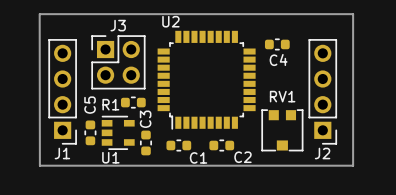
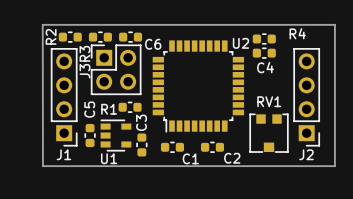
U2 name position: U2 (170, 21) -> U2 (240, 43)
J3 name rotation: 0° (118, 25) -> 90° counterclockwise (85, 71)
J3 name position: J3 (118, 25) -> J3 (85, 71)
R2: none -> (70, 37)
R3: none -> (100, 37)
C6: none -> (130, 37)
R4: none -> (264, 38)

